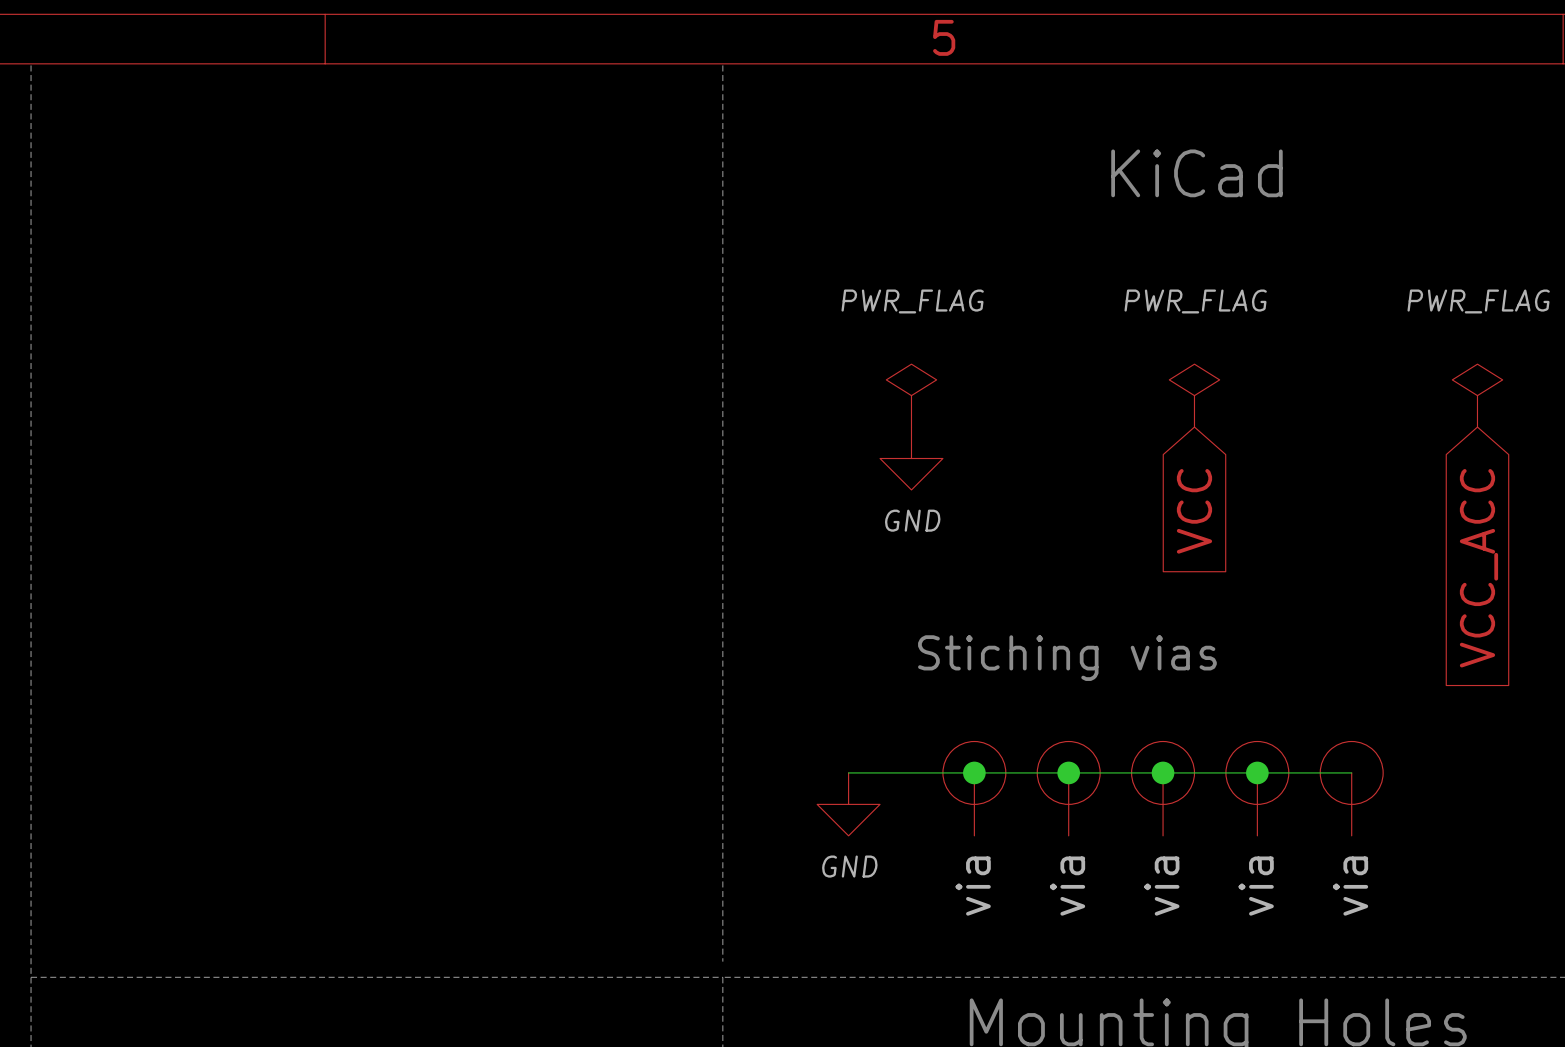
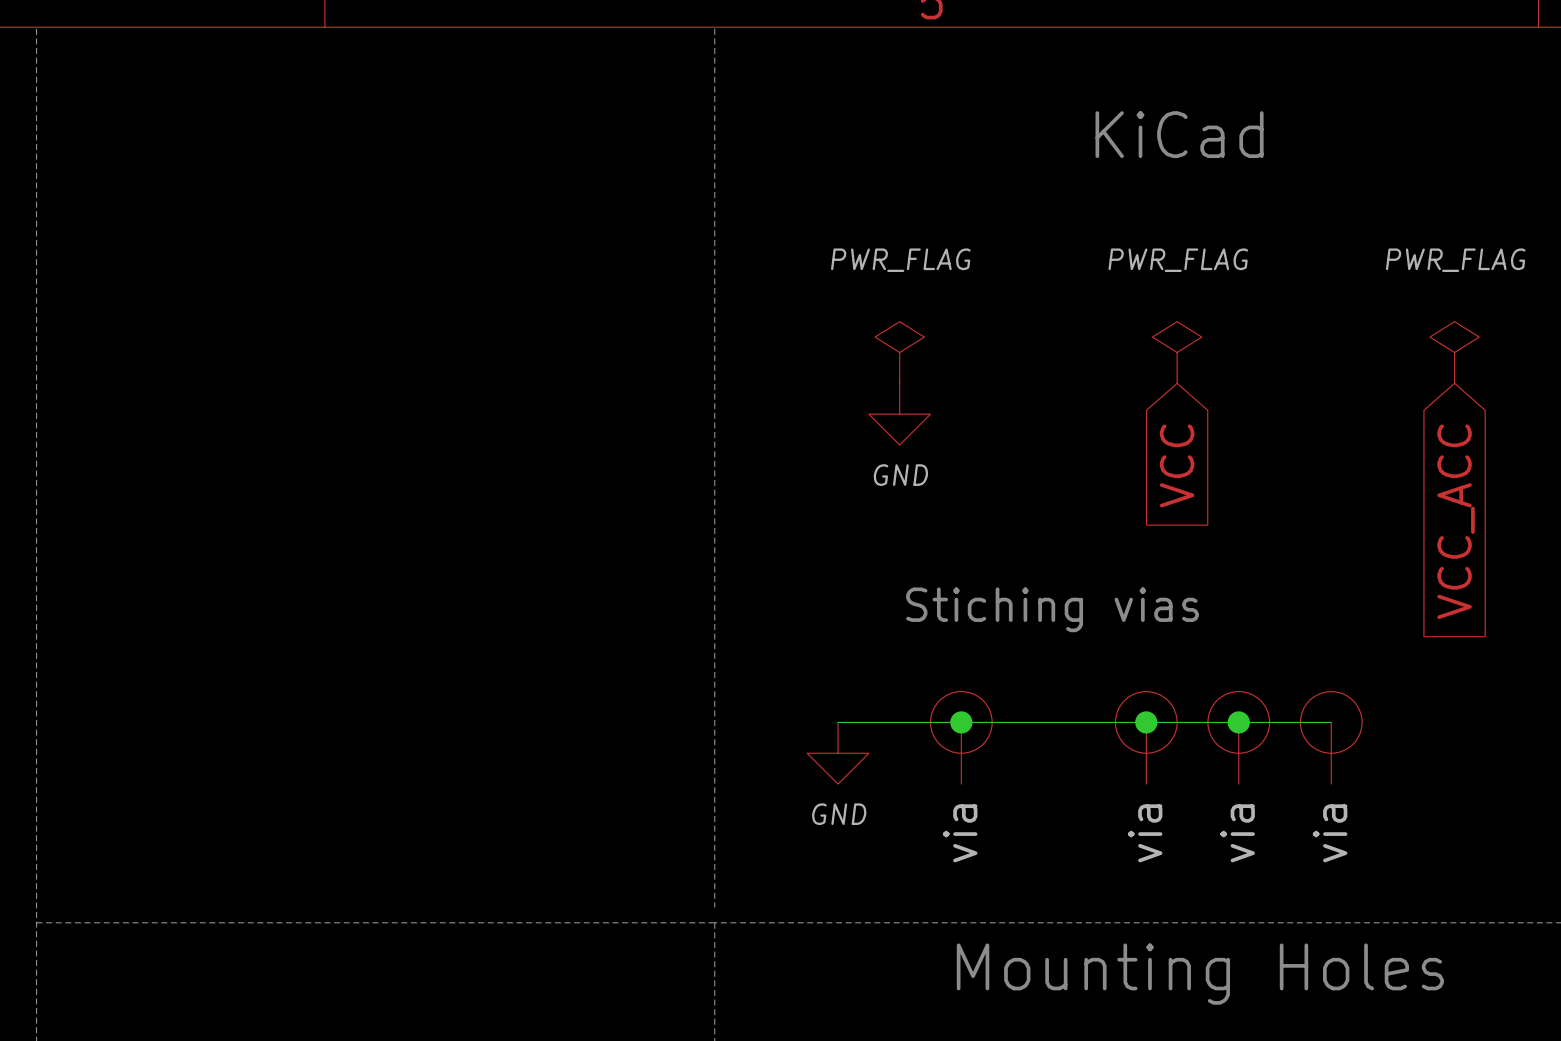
junction: (1068, 772) -> none
part: (1068, 788) -> none

